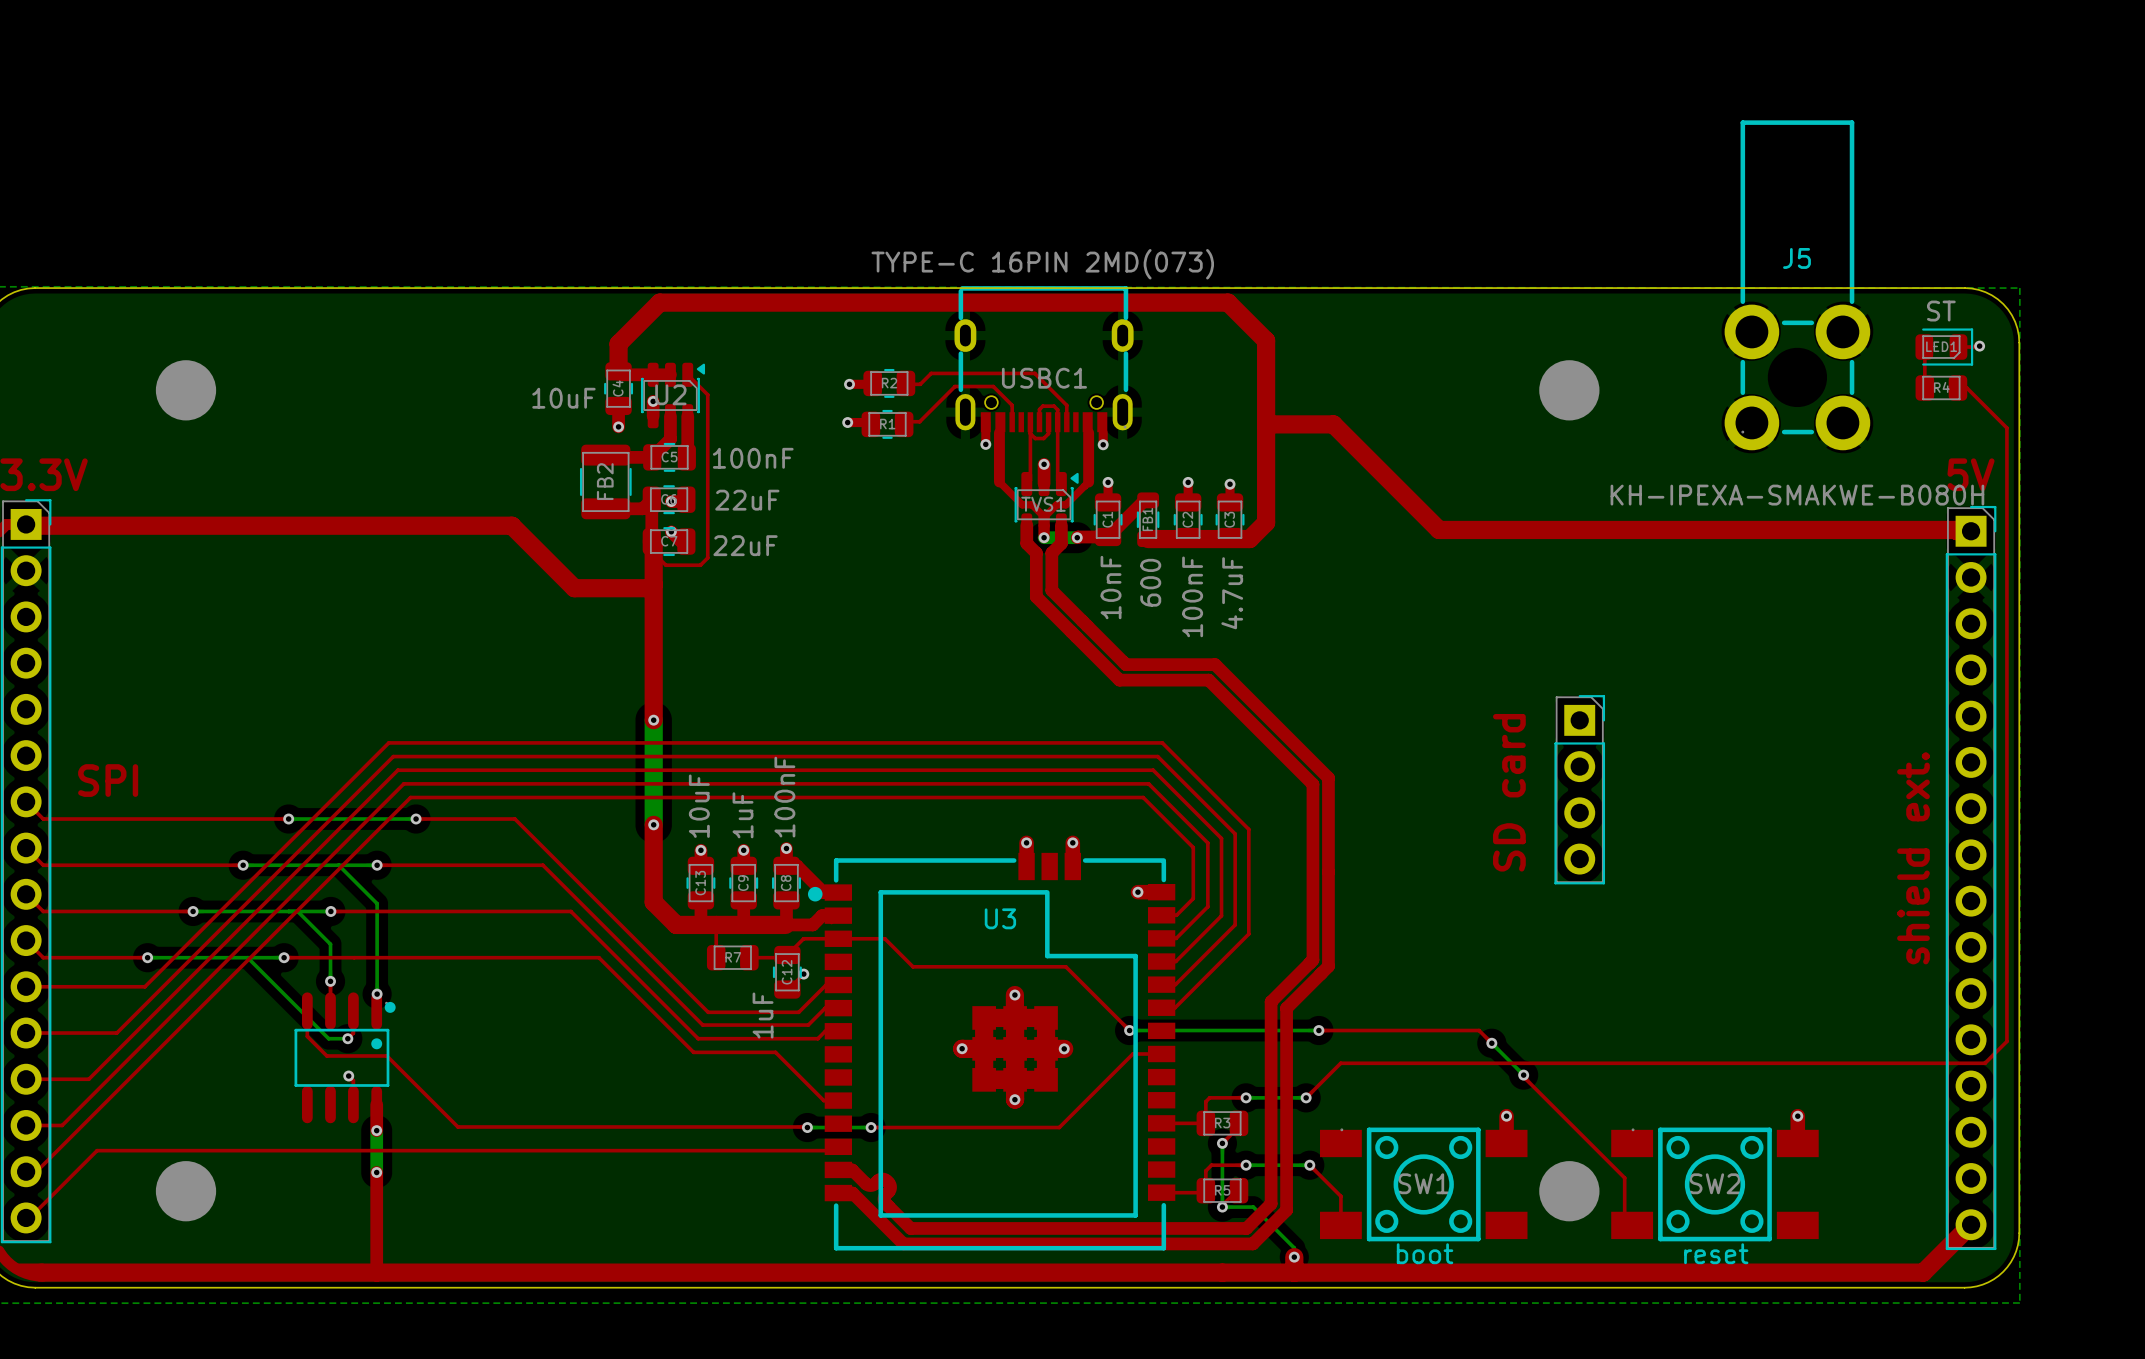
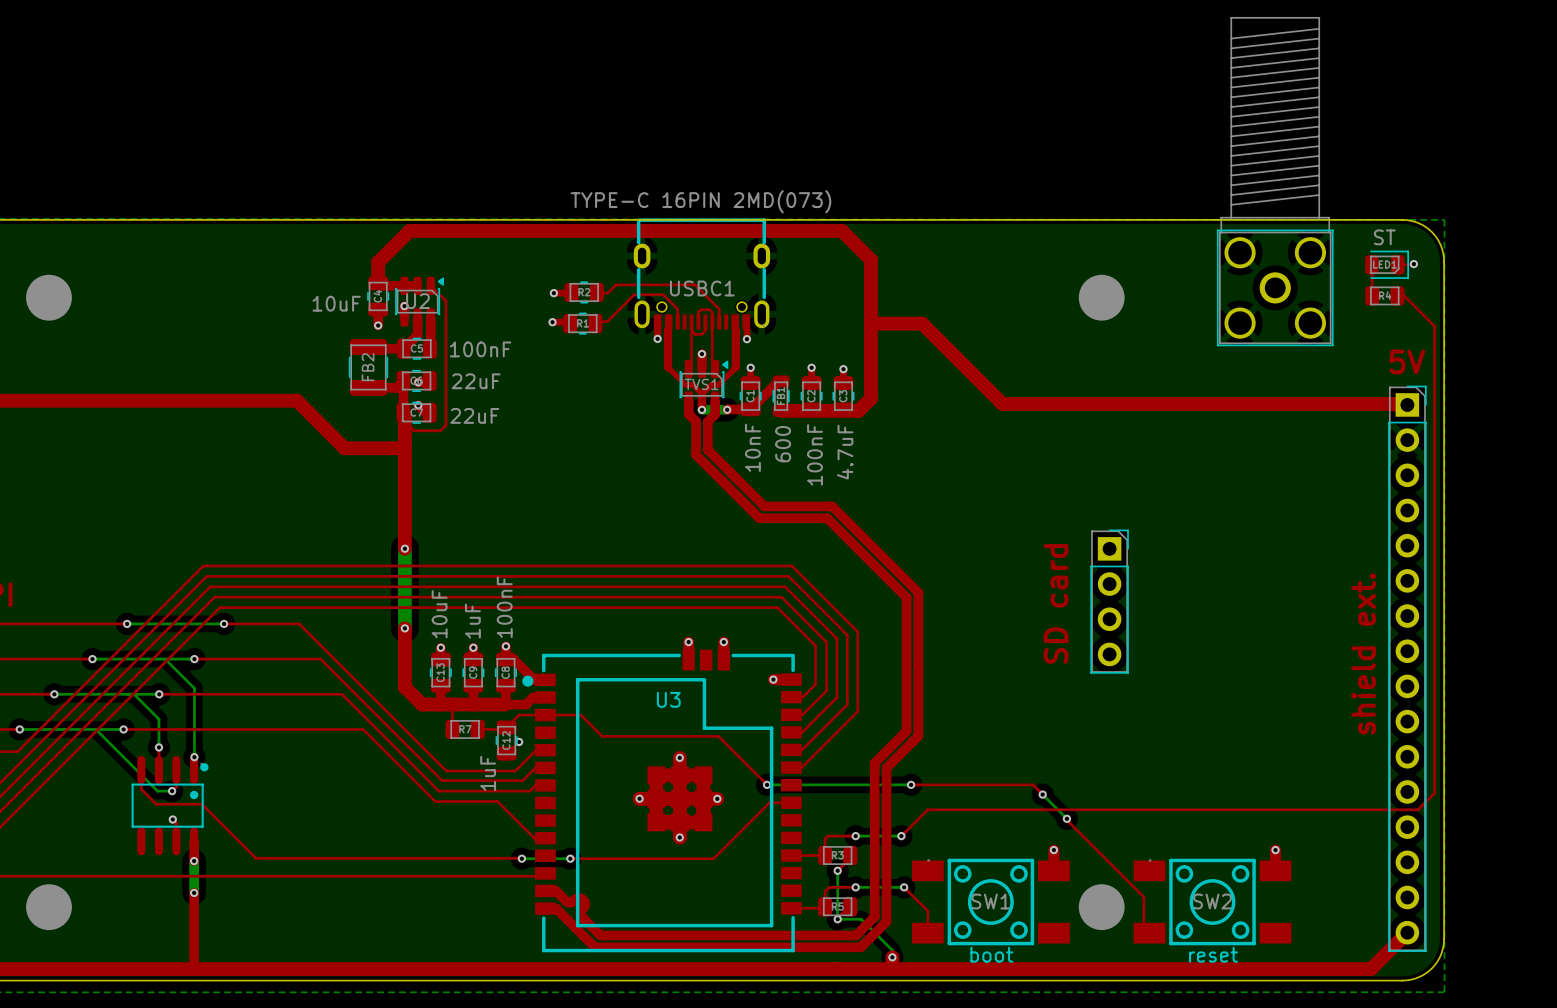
part: none -> (1275, 181)
J5: KH-IPEXA-SMAKWE-B080H (1797, 285) -> none

